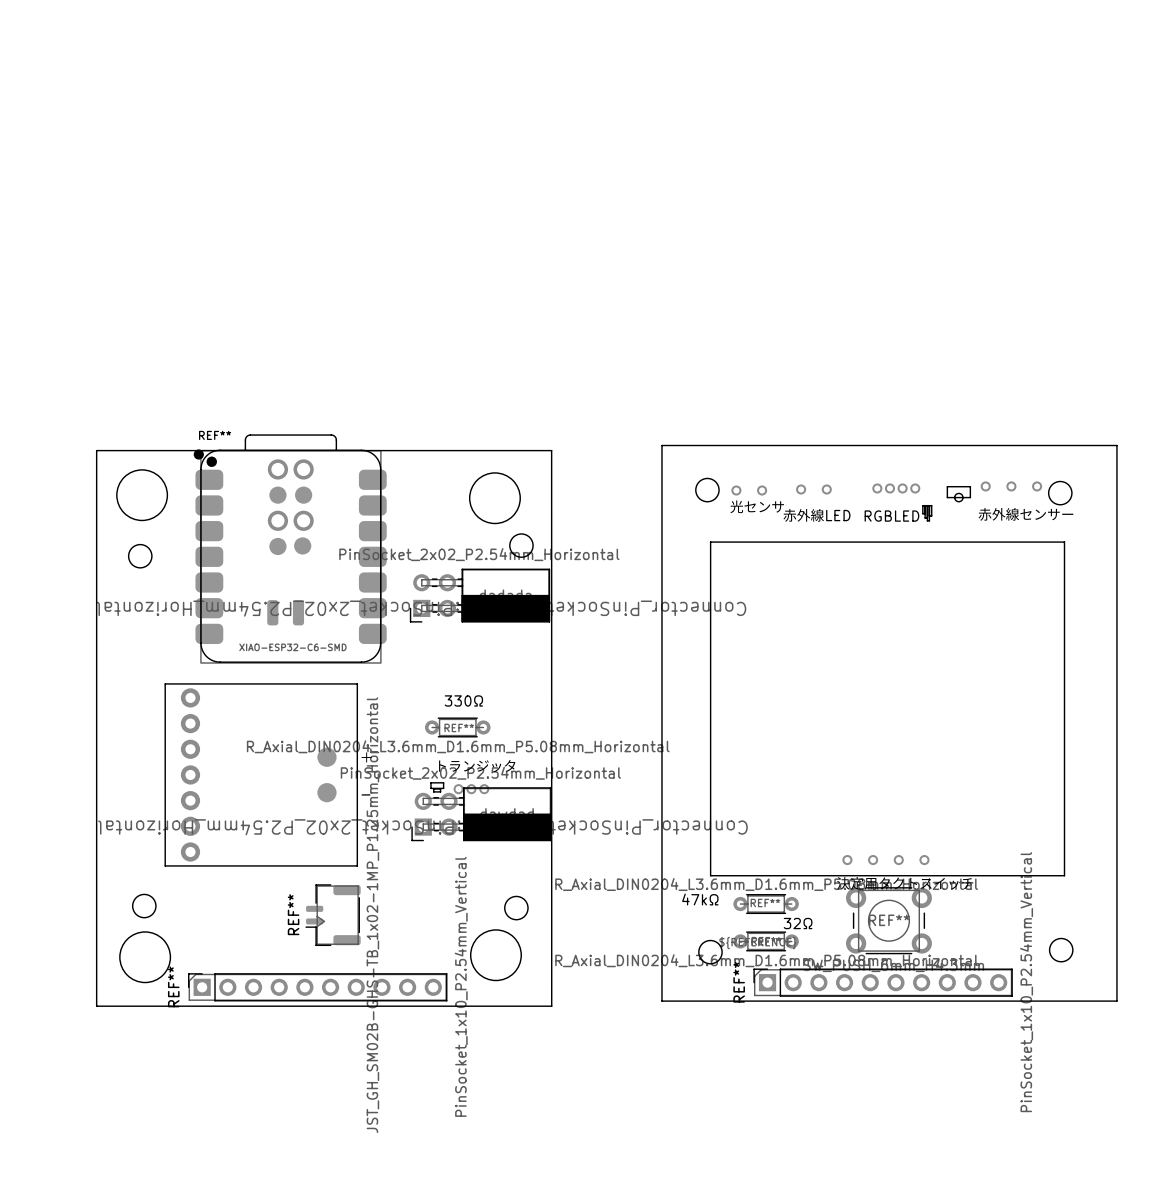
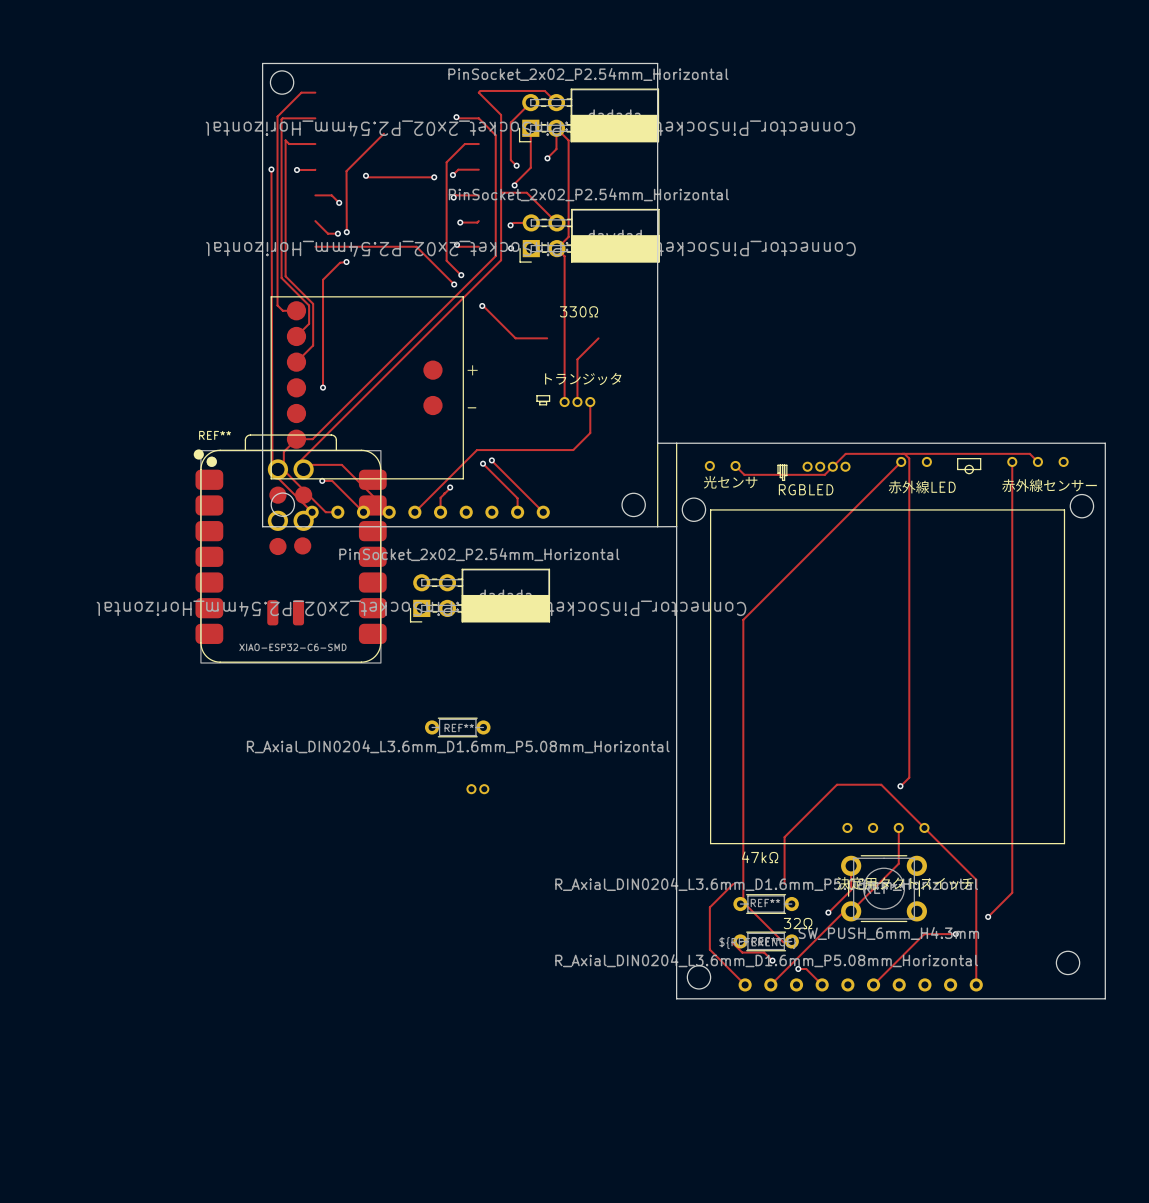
board edge: none -> (262, 63) (262, 526) (676, 526) (676, 998) (1105, 998) (1105, 443) (657, 443) (657, 63) (262, 63)
round board edge: none -> [270, 70, 294, 95]
track: none -> (315, 92) (301, 92) (277, 116) (277, 305) (282, 310) (296, 310)
track: none -> (530, 102) (510, 122) (510, 160) (516, 165)
track: none -> (556, 102) (544, 90) (480, 90) (478, 92) (501, 114) (501, 260) (296, 464) (341, 464) (389, 512)
part: none -> PinSocket_2x02_P2.54mm_Horizontal (589, 115)
track: none -> (456, 117) (478, 118) (495, 135) (495, 256) (312, 439) (296, 439) (283, 451) (283, 470) (325, 512) (337, 512)
via: none -> (456, 117)
track: none -> (315, 118) (281, 119) (281, 278) (309, 305) (309, 323) (296, 336)
track: none -> (530, 128) (530, 167) (514, 184)
track: none -> (383, 133) (346, 171) (346, 232)
track: none -> (315, 144) (289, 144) (285, 140) (285, 276) (313, 303) (313, 345) (296, 362)
track: none -> (478, 144) (464, 144) (446, 162) (446, 260) (461, 275)
track: none -> (546, 158) (556, 149) (556, 128) (568, 140) (568, 236) (556, 248) (564, 256) (564, 402)
via: none -> (547, 158)
via: none -> (516, 165)
via: none -> (271, 169)
track: none -> (272, 169) (272, 472) (312, 512)
via: none -> (296, 169)
track: none -> (315, 169) (296, 169)
track: none -> (478, 169) (458, 169) (452, 175)
track: none -> (365, 175) (434, 177)
via: none -> (365, 175)
via: none -> (452, 175)
via: none -> (434, 177)
via: none -> (514, 185)
track: none -> (501, 192) (526, 192) (556, 222)
track: none -> (315, 195) (331, 195) (339, 202)
track: none -> (478, 195) (455, 195) (453, 197)
via: none -> (453, 197)
via: none -> (339, 202)
track: none -> (315, 221) (327, 233) (337, 233)
track: none -> (478, 221) (460, 222)
via: none -> (460, 222)
track: none -> (531, 222) (513, 222) (510, 226)
via: none -> (510, 225)
via: none -> (346, 232)
via: none -> (337, 233)
part: none -> PinSocket_2x02_P2.54mm_Horizontal (589, 235)
track: none -> (456, 244) (458, 246) (478, 246)
via: none -> (456, 244)
track: none -> (315, 246) (416, 246) (454, 284)
via: none -> (511, 248)
track: none -> (345, 262) (340, 262) (323, 279) (323, 387)
via: none -> (346, 262)
via: none -> (461, 275)
via: none -> (454, 284)
line: none -> (271, 296) (463, 296) (463, 478) (271, 478) (271, 296)
track: none -> (482, 304) (515, 338) (547, 338)
via: none -> (482, 305)
part: none -> (296, 310)
text: none -> 330Ω (578, 311)
part: none -> (296, 336)
track: none -> (598, 338) (577, 359) (577, 402)
part: none -> (296, 362)
part: none -> (432, 370)
text: none -> ＋ (472, 370)
text: none -> トランジッタ (583, 379)
part: none -> (296, 387)
via: none -> (323, 387)
line: none -> (536, 395) (549, 395) (549, 401) (536, 401) (536, 395)
line: none -> (539, 401) (546, 401) (546, 404) (539, 404) (539, 401)
part: none -> (564, 402)
part: none -> (577, 402)
track: none -> (590, 402) (590, 433) (573, 450) (477, 450) (414, 512)
part: none -> (590, 402)
part: none -> (432, 405)
text: none -> - (472, 407)
part: none -> (296, 413)
part: none -> (296, 439)
line: none -> (657, 443) (657, 526)
line: none -> (676, 443) (676, 526)
board edge: (661, 445) (1116, 445) (1116, 1001) (661, 1001) (661, 445) -> none
board edge: (96, 450) (96, 1006) (551, 1006) (551, 450) (96, 450) -> none
track: none -> (904, 453) (909, 458) (909, 777) (900, 786)
via: none -> (491, 460)
track: none -> (492, 460) (543, 512)
track: none -> (901, 461) (743, 619) (743, 902) (783, 942)
part: none -> (901, 461)
part: none -> (926, 461)
track: none -> (1012, 461) (1012, 892) (987, 917)
part: none -> (1012, 461)
track: none -> (1037, 461) (1029, 453) (845, 453) (824, 474) (744, 474) (735, 465)
part: none -> (1037, 461)
part: none -> (1063, 461)
track: none -> (482, 463) (517, 498) (517, 512)
via: none -> (483, 463)
part: none -> (709, 465)
part: none -> (735, 465)
part: none -> (807, 466)
part: none -> (820, 466)
part: none -> (832, 466)
part: none -> (845, 466)
round board edge: [116, 469, 168, 521] -> none
round board edge: [469, 472, 521, 524] -> none
track: none -> (322, 480) (332, 480) (363, 512)
via: none -> (322, 480)
line: (947, 486) (970, 486) (970, 497) (947, 497) (947, 486) -> (957, 458) (980, 458) (980, 469) (957, 469) (957, 458)
part: (985, 486) -> none
part: (1011, 486) -> none
part: (1037, 486) -> none
track: none -> (450, 487) (440, 497) (440, 512)
via: none -> (450, 487)
part: (877, 488) -> none
part: (889, 488) -> none
part: (902, 488) -> none
part: (915, 488) -> none
part: (801, 489) -> none
part: (826, 489) -> none
round board edge position: (707, 490) -> (693, 509)
part: (736, 490) -> none
part: (762, 490) -> none
round board edge: none -> [270, 492, 295, 517]
track: none -> (444, 493) (444, 494)
round board edge: none -> [621, 493, 646, 517]
round board edge position: (1060, 493) -> (1081, 506)
drawing position: (958, 497) -> (969, 469)
line: (925, 505) (925, 518) (927, 518) -> (780, 465) (780, 477) (782, 477)
line: (927, 505) (927, 520) (929, 520) (929, 505) -> (782, 465) (782, 480) (784, 480) (784, 465)
text position: 光センサ (757, 506) -> 光センサ (730, 482)
part: none -> (312, 512)
part: none -> (337, 512)
part: none -> (363, 512)
part: none -> (389, 512)
part: none -> (414, 512)
part: none -> (440, 512)
part: none -> (466, 512)
part: none -> (491, 512)
part: none -> (517, 512)
part: none -> (543, 512)
line: (925, 513) (922, 513) (922, 505) (931, 505) (931, 516) (929, 516) -> (780, 473) (778, 473) (778, 465) (786, 465) (786, 475) (784, 475)
text position: 赤外線センサー (1025, 514) -> 赤外線センサー (1049, 485)
text position: 赤外線LED (816, 515) -> 赤外線LED (921, 487)
text position: RGBLED (891, 516) -> RGBLED (806, 489)
round board edge: [509, 533, 534, 558] -> none
line: (710, 542) (1064, 542) -> (710, 542) (710, 509) (1064, 509) (1064, 542)
round board edge: [128, 544, 153, 569] -> none
line: (165, 683) (357, 683) (357, 865) (165, 865) (165, 683) -> none
part: (190, 697) -> none
text: 330Ω (463, 700) -> none
part: (190, 723) -> none
part: (190, 749) -> none
part: (326, 757) -> none
text: ＋ (366, 757) -> none
text: トランジッタ (477, 766) -> none
part: (190, 774) -> none
line: (430, 782) (443, 782) (443, 788) (430, 788) (430, 782) -> none
via: none -> (900, 786)
line: (433, 788) (440, 788) (440, 791) (433, 791) (433, 788) -> none
part: (458, 789) -> none
part: (326, 792) -> none
text: - (366, 794) -> none
part: (190, 800) -> none
part: PinSocket_2x02_P2.54mm_Horizontal (481, 814) -> none
part: (190, 826) -> none
part: none -> (847, 827)
part: none -> (873, 827)
track: none -> (898, 827) (898, 863) (851, 911) (844, 911) (770, 984)
part: none -> (898, 827)
part: none -> (924, 827)
line: (710, 843) (710, 875) (1064, 875) (1064, 843) -> (710, 843) (1064, 843)
part: (190, 852) -> none
part: (847, 860) -> none
part: (873, 860) -> none
part: (898, 860) -> none
part: (924, 860) -> none
track: none -> (851, 865) (851, 890) (828, 912)
track: none -> (733, 884) (709, 907) (709, 949) (745, 984)
track: none -> (784, 884) (784, 837) (837, 784) (881, 784) (976, 879) (976, 984)
round board edge: [132, 894, 157, 918] -> none
round board edge: [504, 896, 529, 920] -> none
text position: 47kΩ (700, 899) -> 47kΩ (760, 857)
via: none -> (828, 912)
REF**: JST_GH_SM02B-GHS-TB_1x02-1MP_P1.25mm_Horizontal (333, 915) -> none
via: none -> (988, 916)
REF** position: (888, 920) -> (884, 888)
round board edge: [470, 929, 522, 981] -> none
round board edge: [119, 931, 171, 983] -> none
track: none -> (955, 934) (924, 934) (873, 984)
via: none -> (955, 934)
track: none -> (732, 942) (742, 952) (764, 952) (772, 960)
round board edge position: (1061, 950) -> (1068, 962)
round board edge position: (710, 952) -> (698, 977)
via: none -> (772, 960)
track: none -> (798, 968) (806, 968) (822, 984)
via: none -> (798, 968)
REF**: PinSocket_1x10_P2.54mm_Vertical (883, 982) -> none
part: none -> (745, 984)
part: none -> (770, 984)
part: none -> (796, 984)
part: none -> (822, 984)
part: none -> (847, 984)
part: none -> (873, 984)
part: none -> (899, 984)
part: none -> (924, 984)
part: none -> (950, 984)
part: none -> (976, 984)
REF**: PinSocket_1x10_P2.54mm_Vertical (317, 987) -> none

